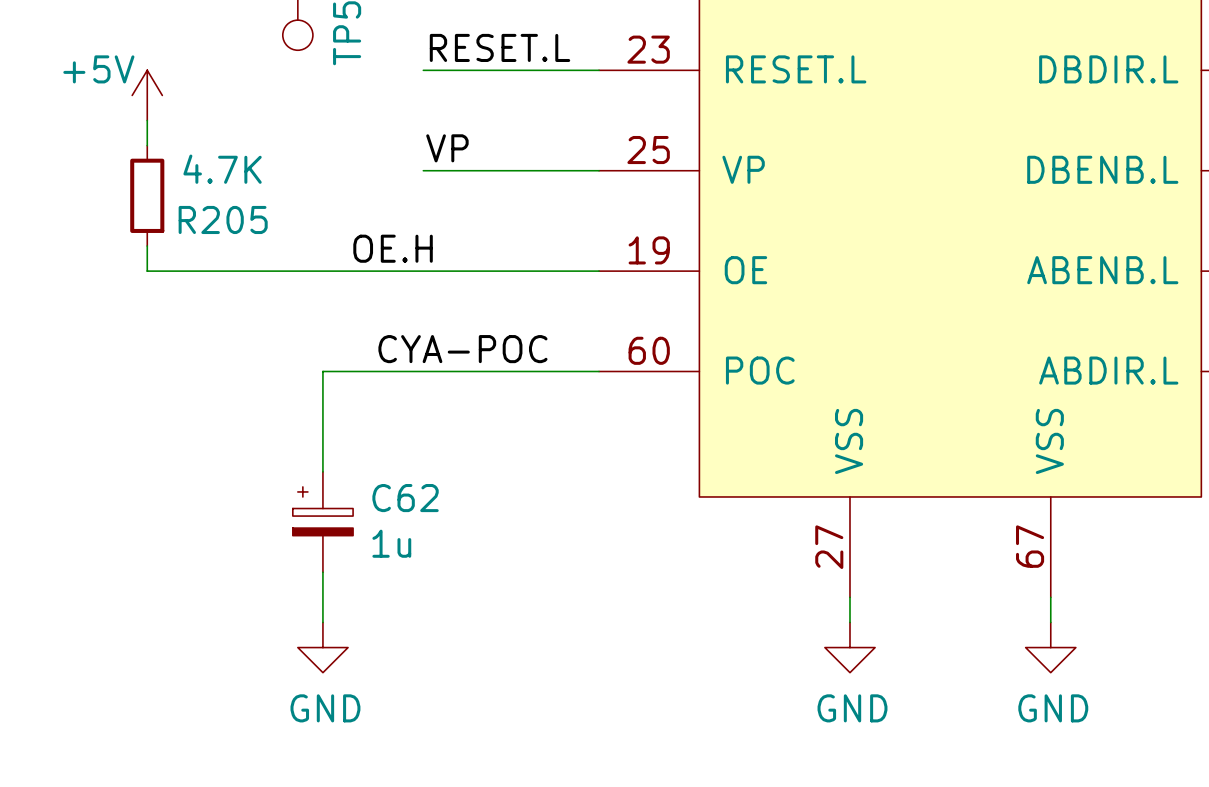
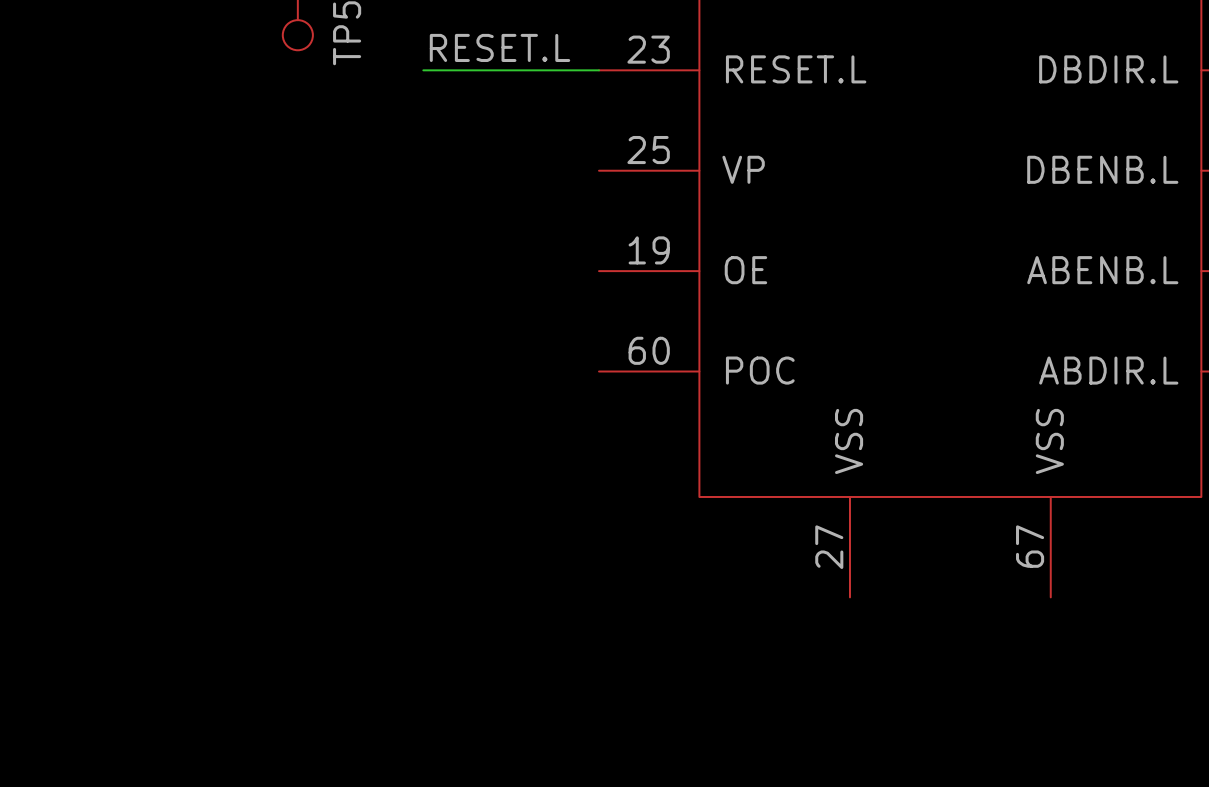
power symbol: +5V (147, 95) -> none
wire: (147, 120) (147, 145) -> none
label: VP (447, 148) -> none
wire: (423, 170) (599, 170) -> none
R205: 4.7K (147, 195) -> none
wire: (147, 246) (147, 271) (599, 271) -> none
label: OE.H (393, 248) -> none
label: CYA-POC (462, 349) -> none
wire: (599, 371) (322, 371) (322, 471) -> none
C62: 1u (322, 522) -> none
wire: (322, 572) (322, 622) -> none
wire: (849, 597) (849, 622) -> none
wire: (1050, 597) (1050, 622) -> none
power symbol: GND (322, 647) -> none
power symbol: GND (849, 647) -> none
power symbol: GND (1050, 647) -> none

